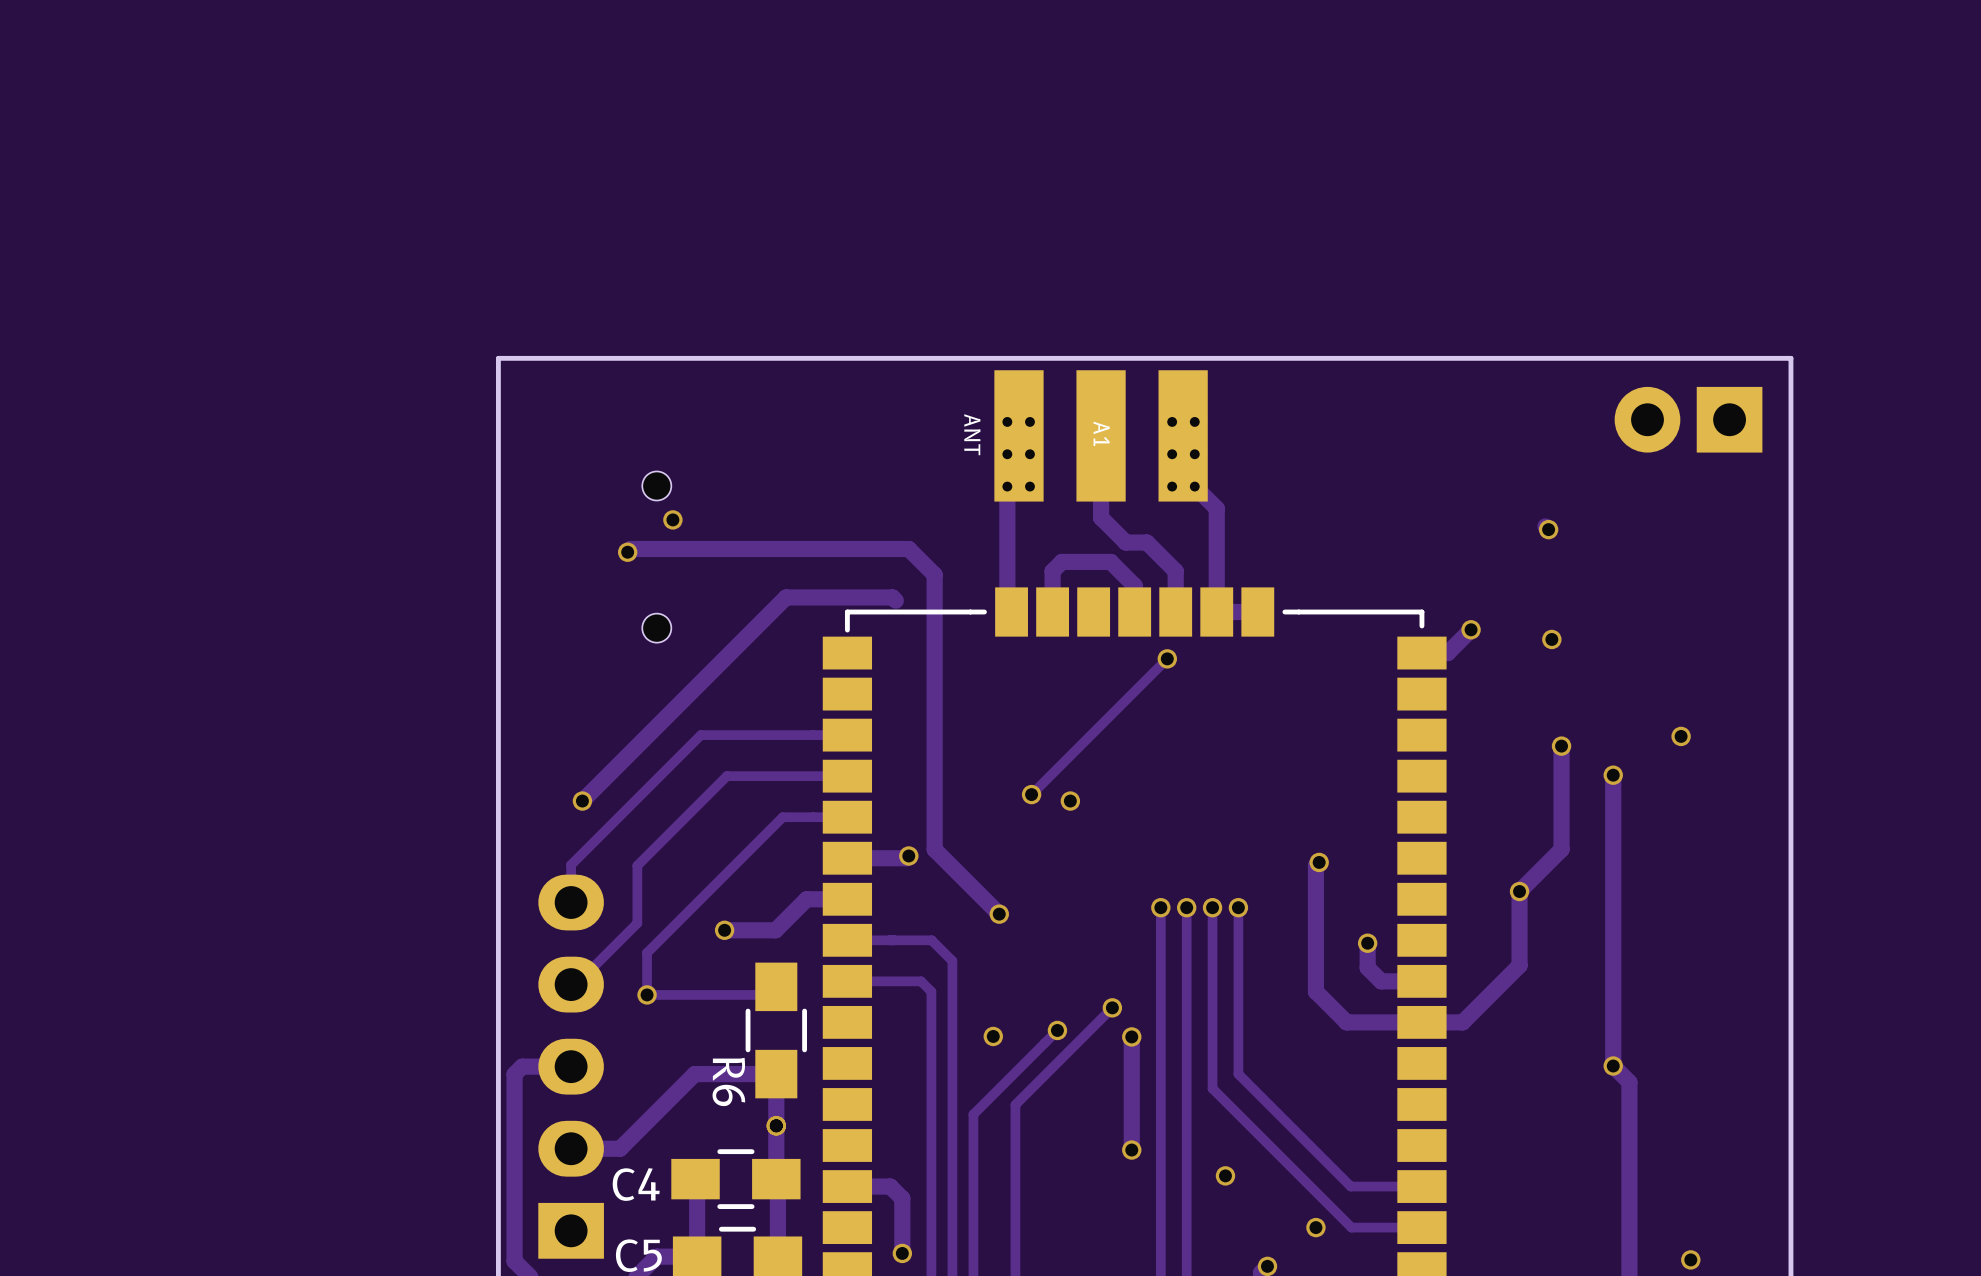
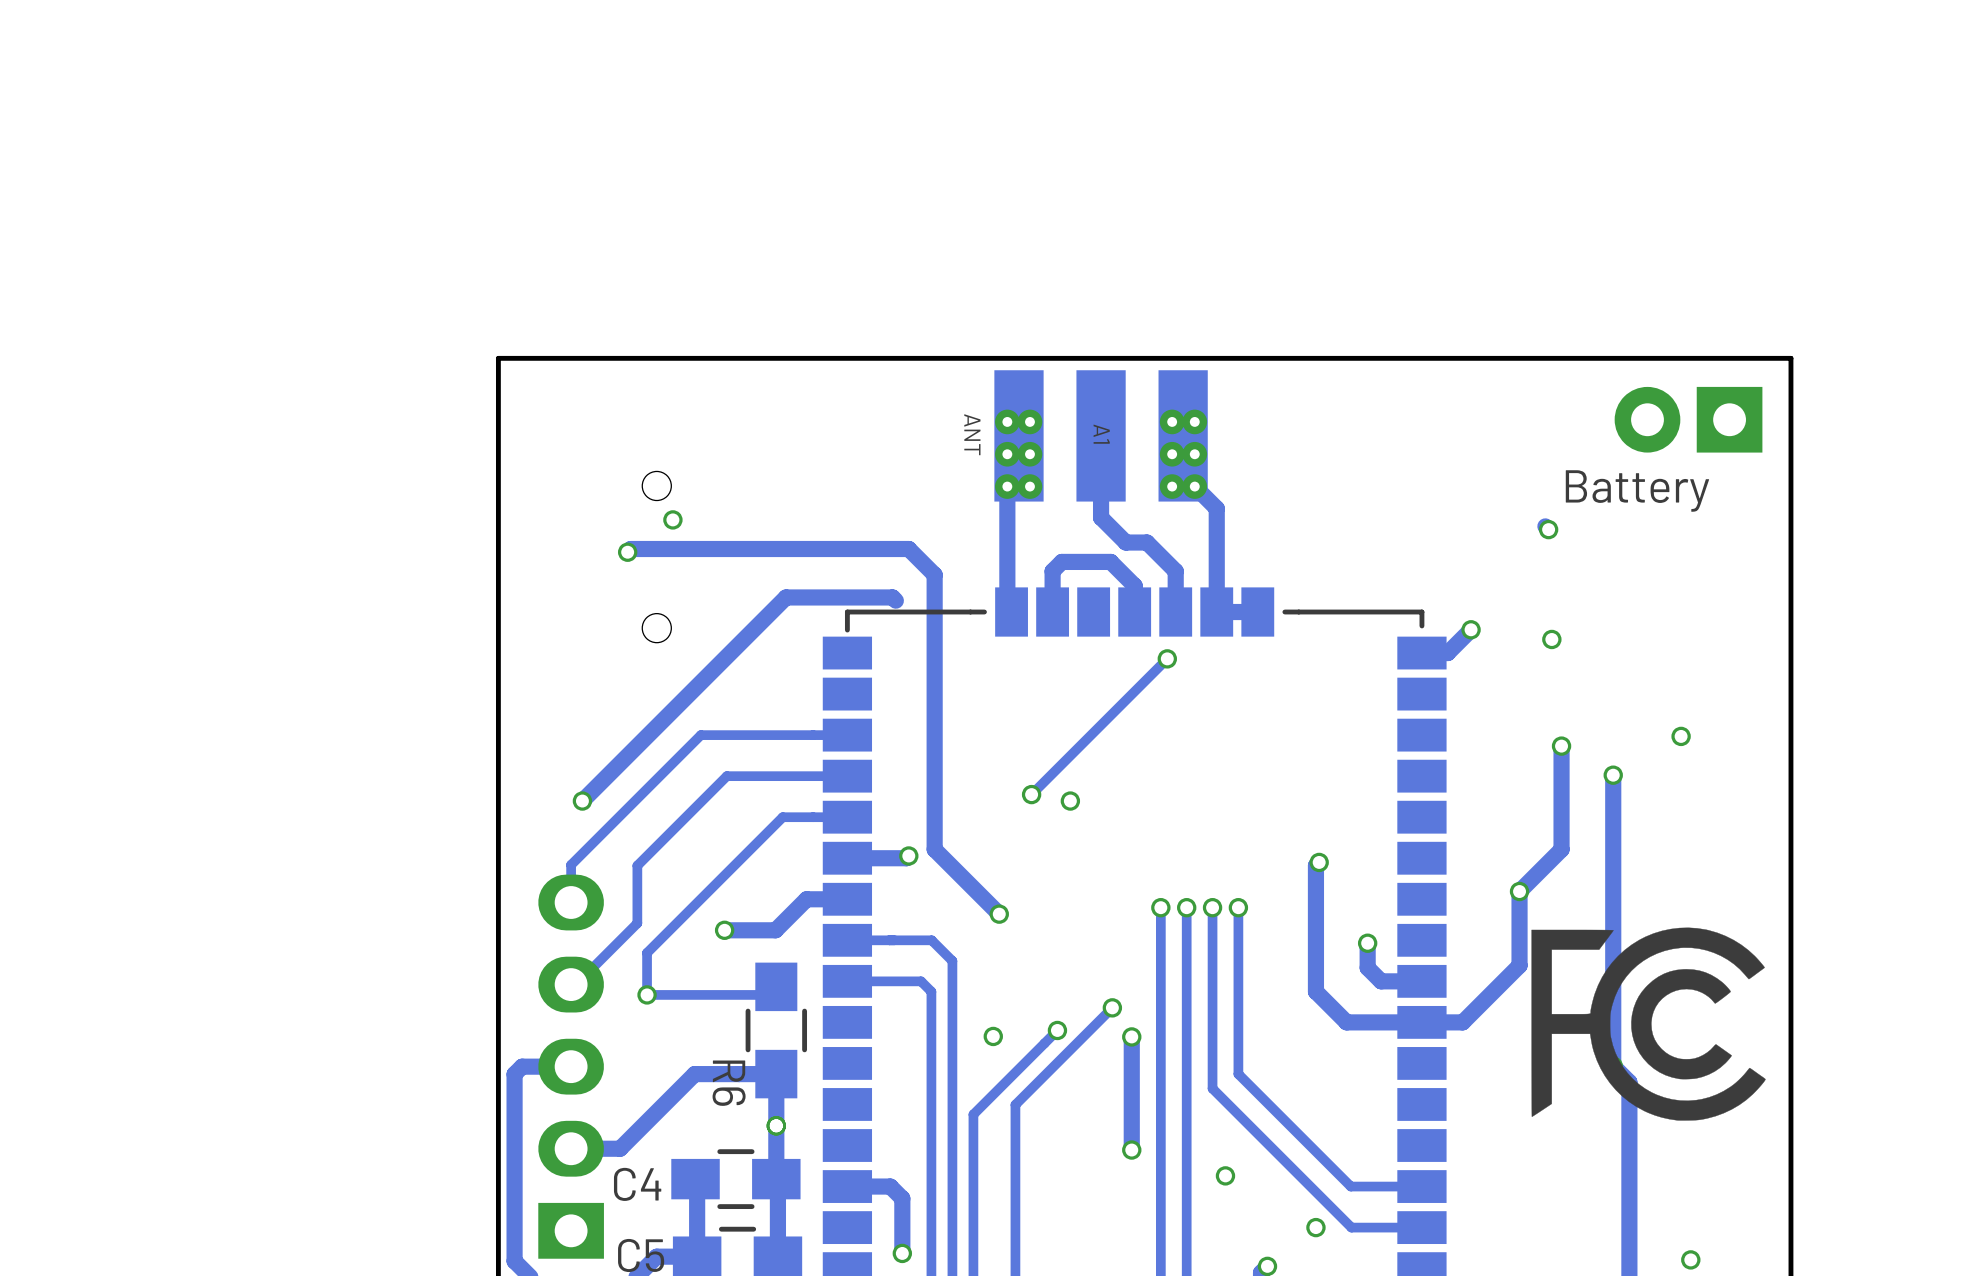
part value: none -> Battery (1637, 491)
drawing: none -> [1531, 927, 1766, 1121]

